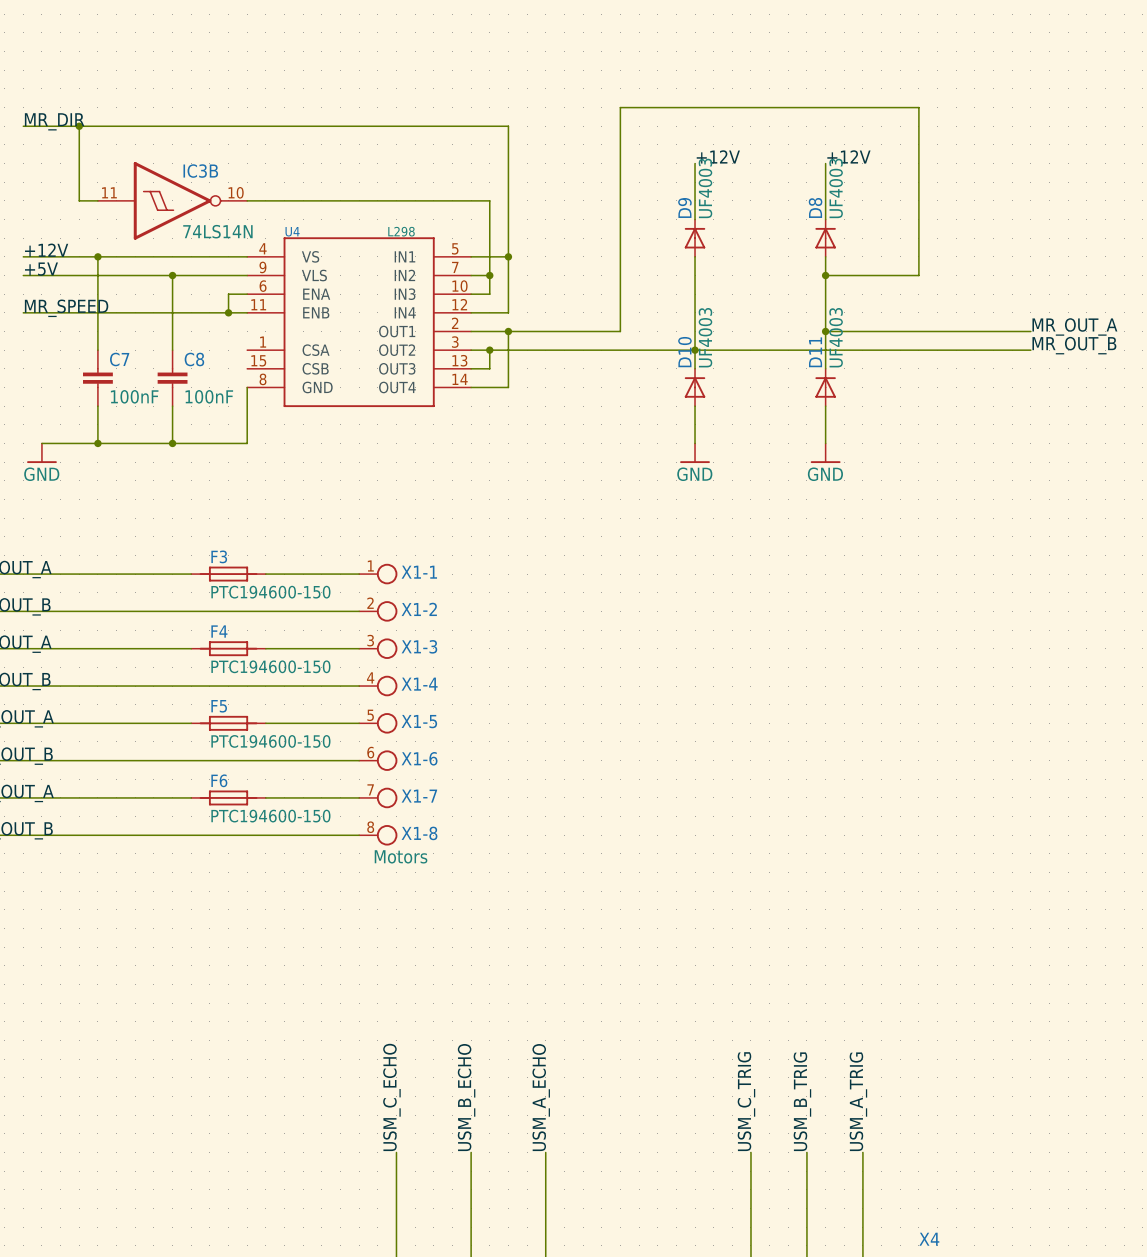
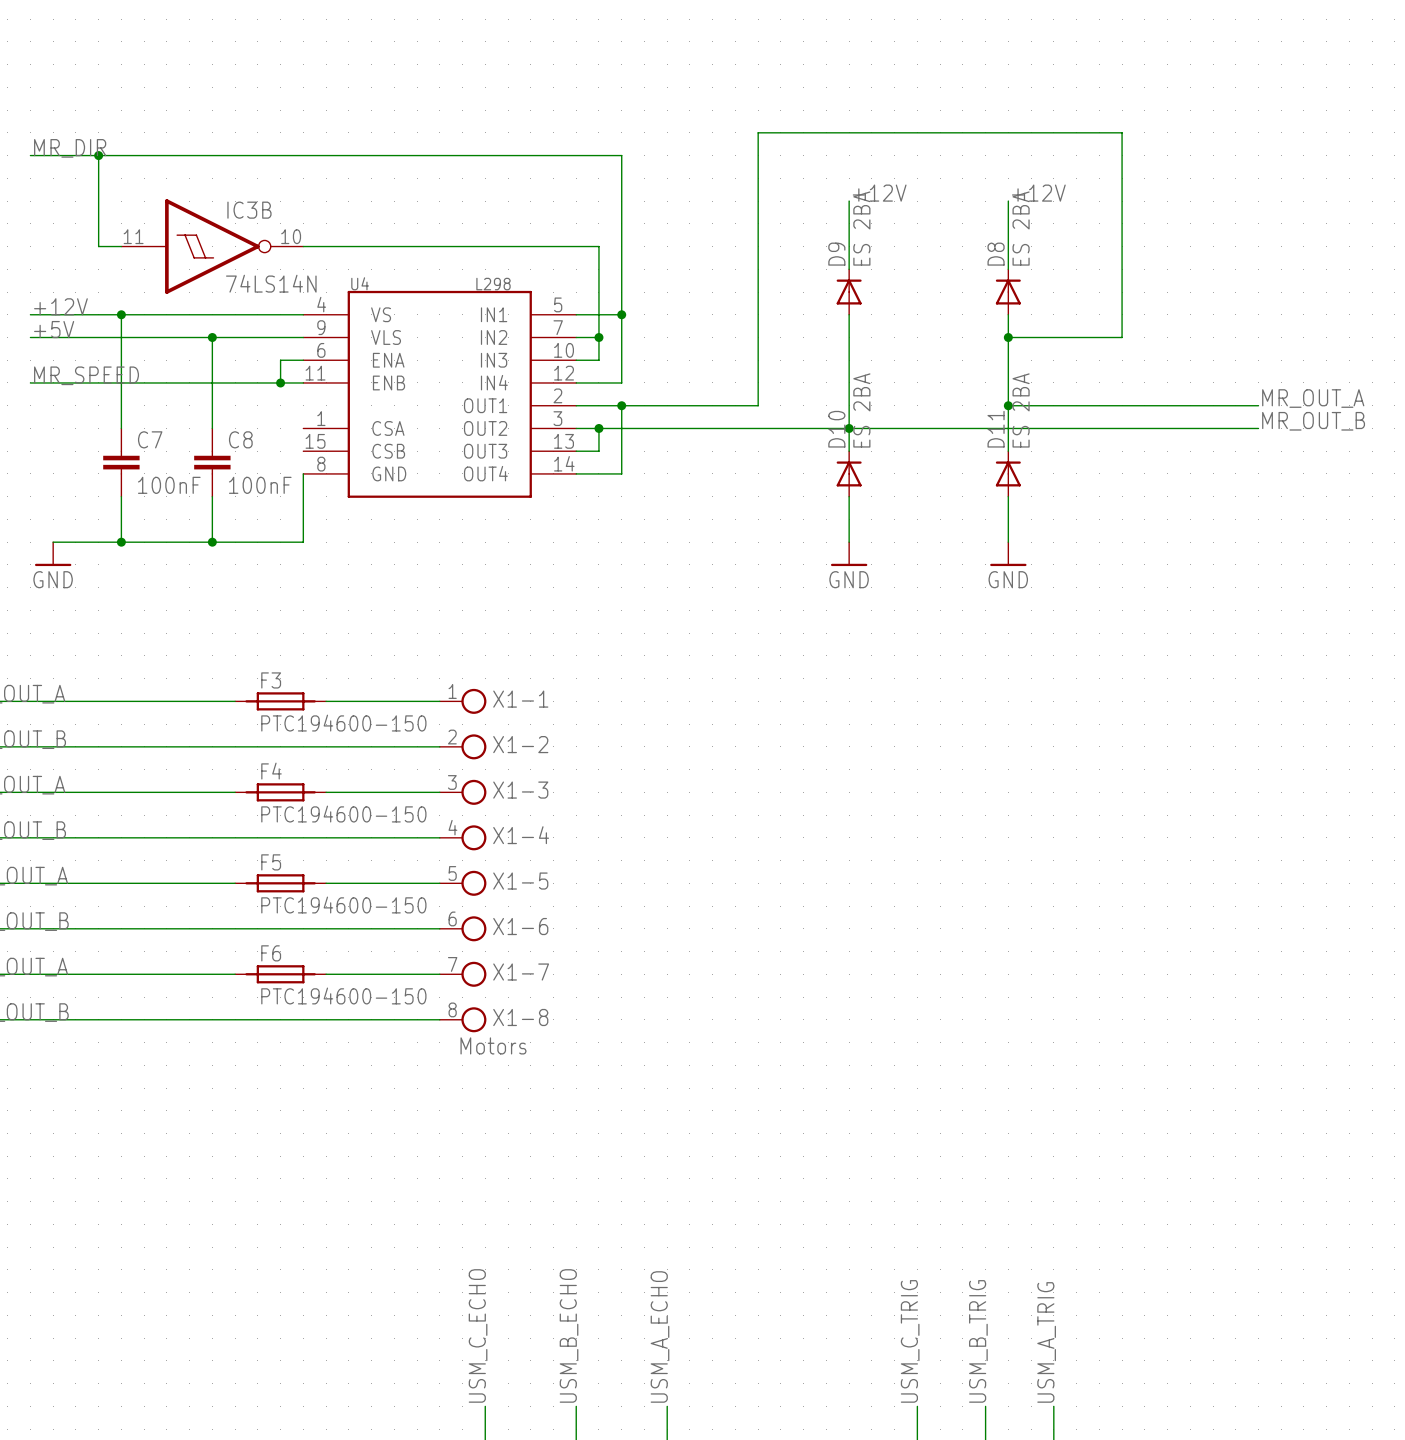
D9 value: UF4003 (705, 188) -> ES 2BA (861, 228)
D8 value: UF4003 (836, 188) -> ES 2BA (1021, 228)
D10 value: UF4003 (705, 337) -> ES 2BA (861, 410)
D11 value: UF4003 (836, 337) -> ES 2BA (1021, 410)

